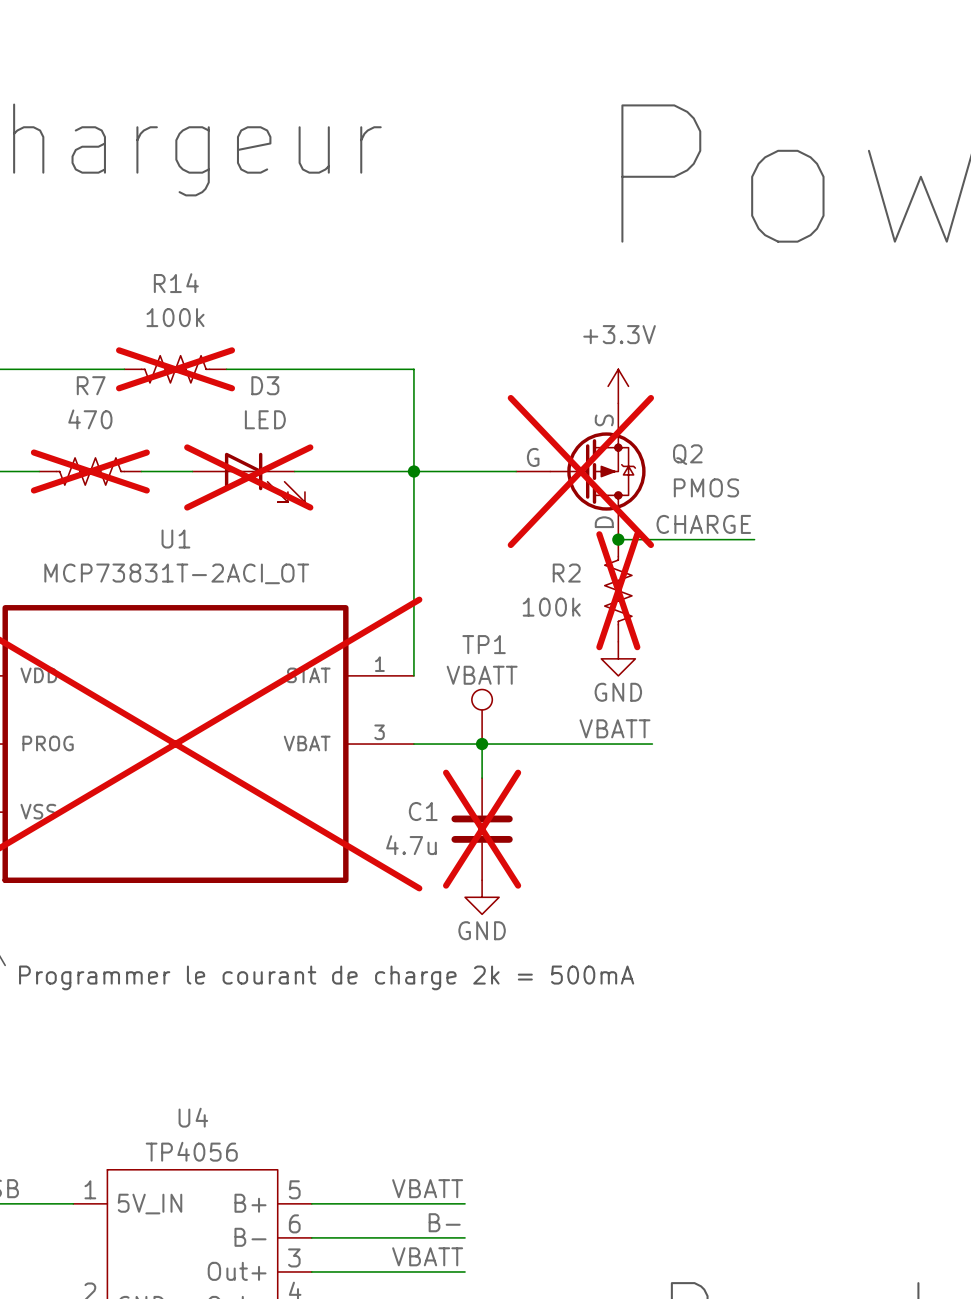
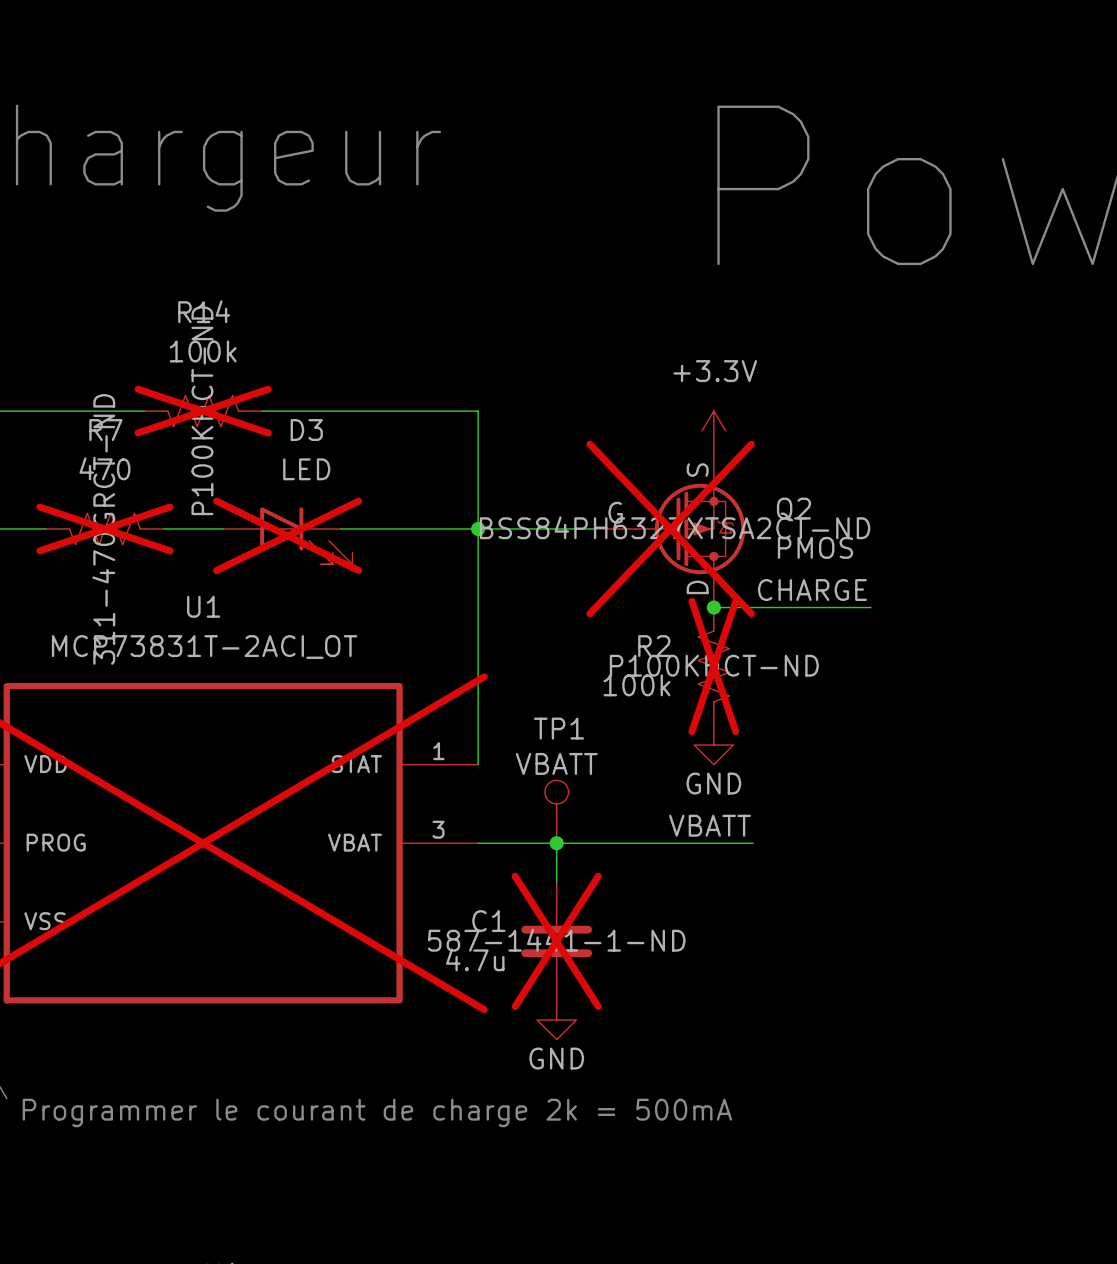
R14 text: none -> P100KHCT-ND (202, 410)
Q2 text: none -> BSS84PH6327XTSA2CT-ND (675, 527)
R7 text: none -> 311-470GRCT-ND (103, 529)
R2 text: none -> P100KHCT-ND (714, 665)
C1 text: none -> 587-1441-1-ND (556, 940)

